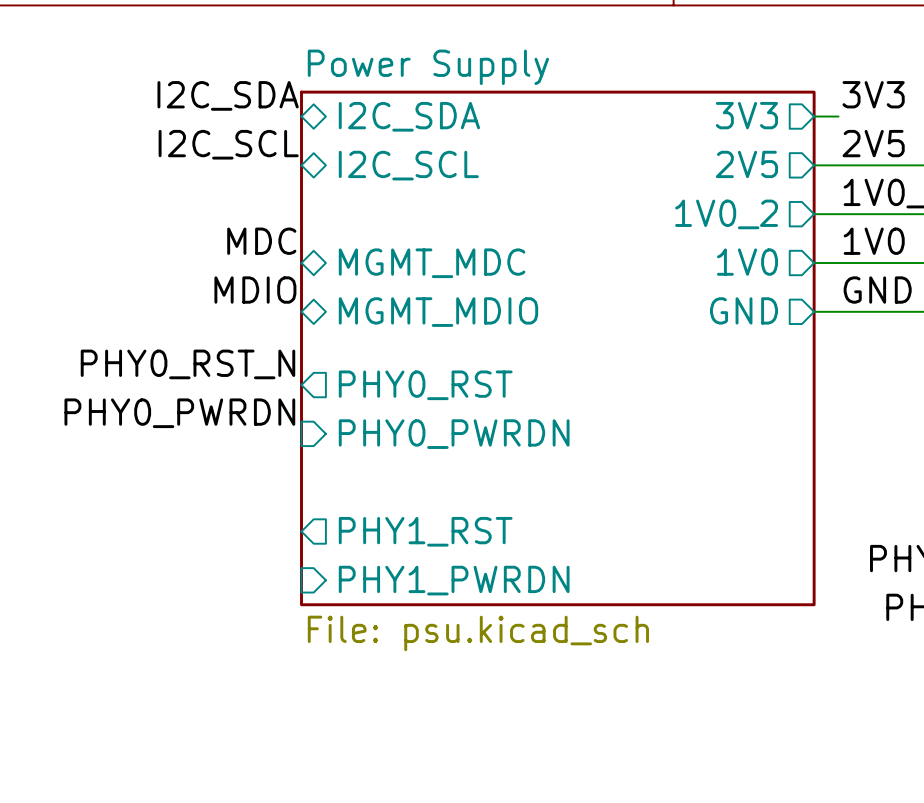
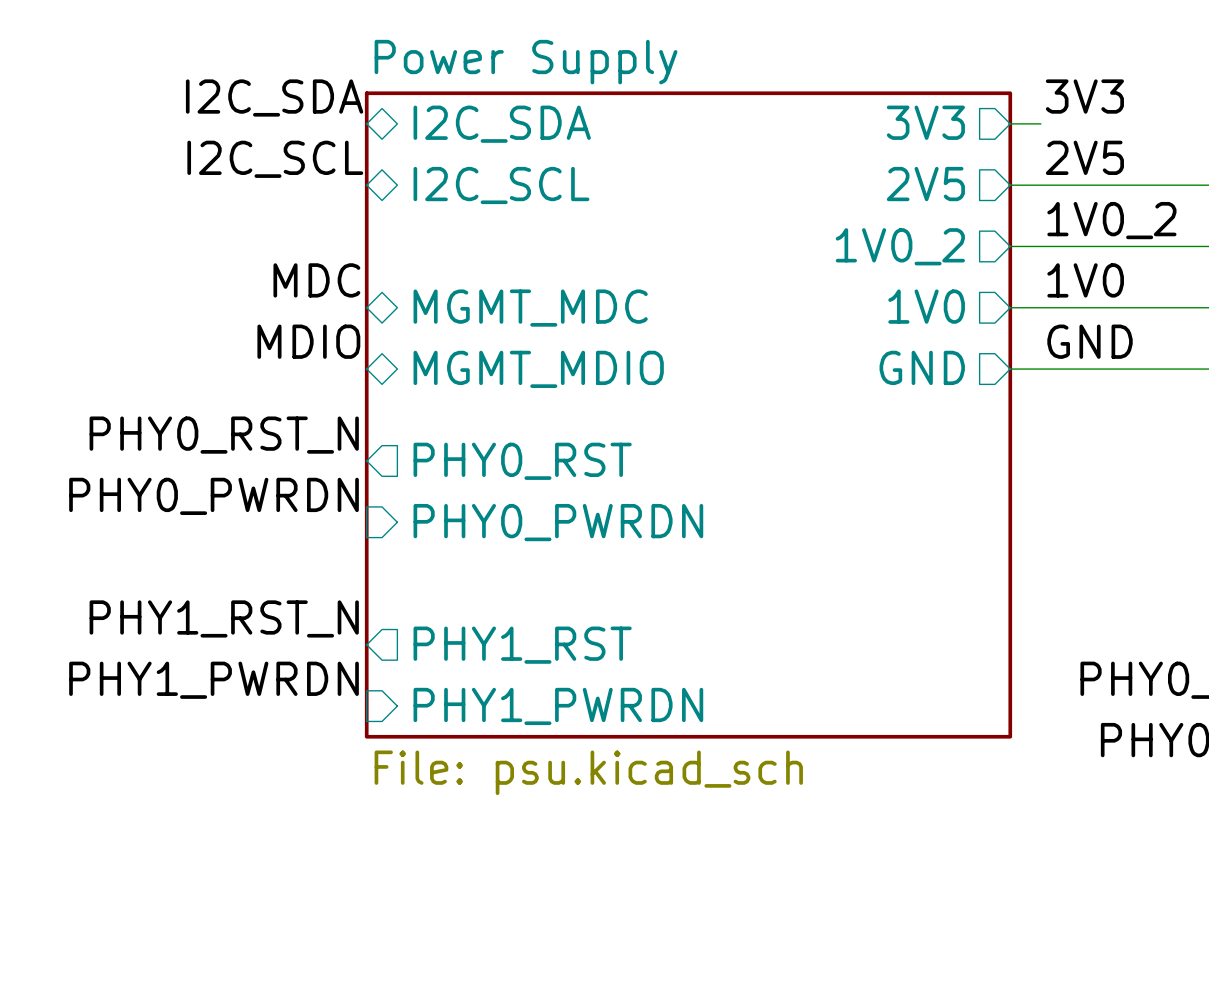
label: none -> PHY1_RST_N (224, 618)
label: none -> PHY1_PWRDN (214, 680)

